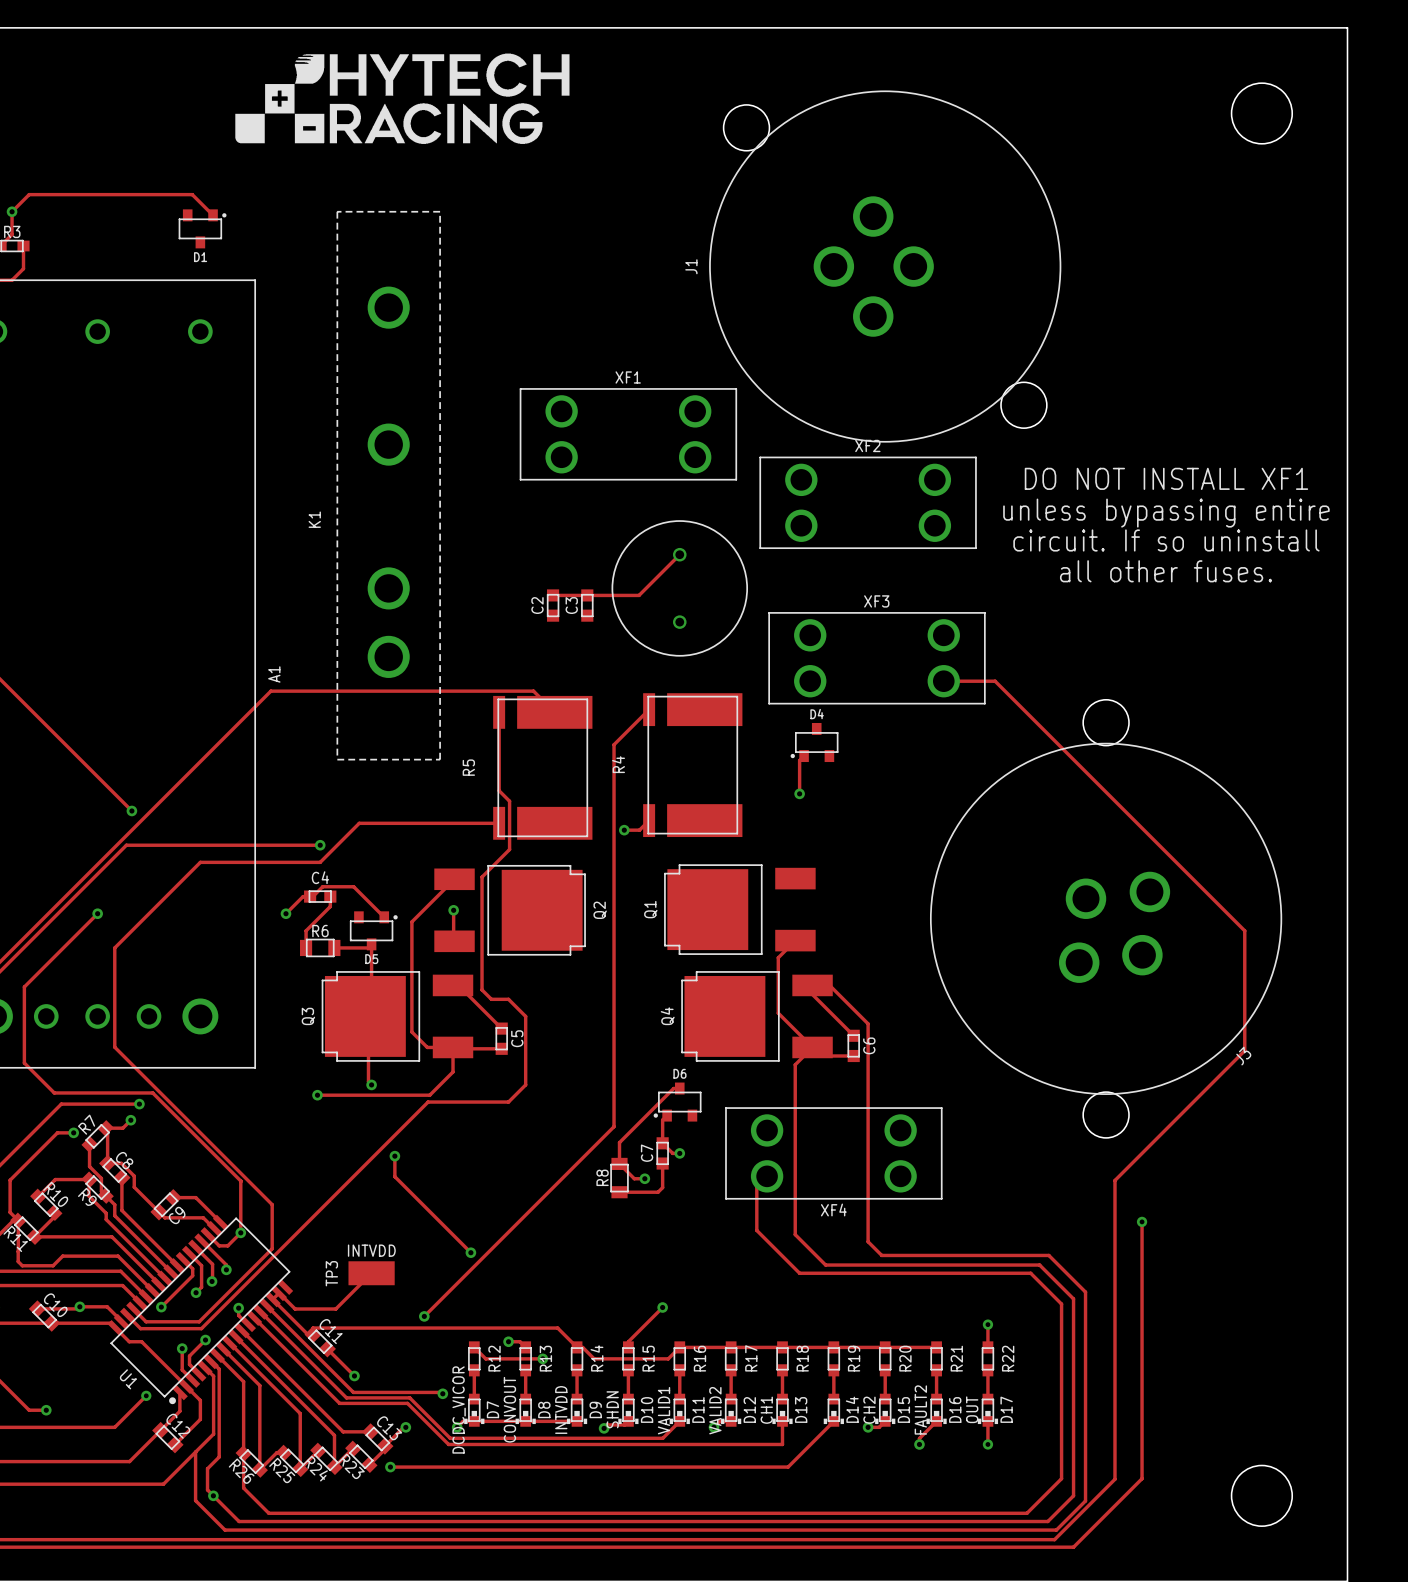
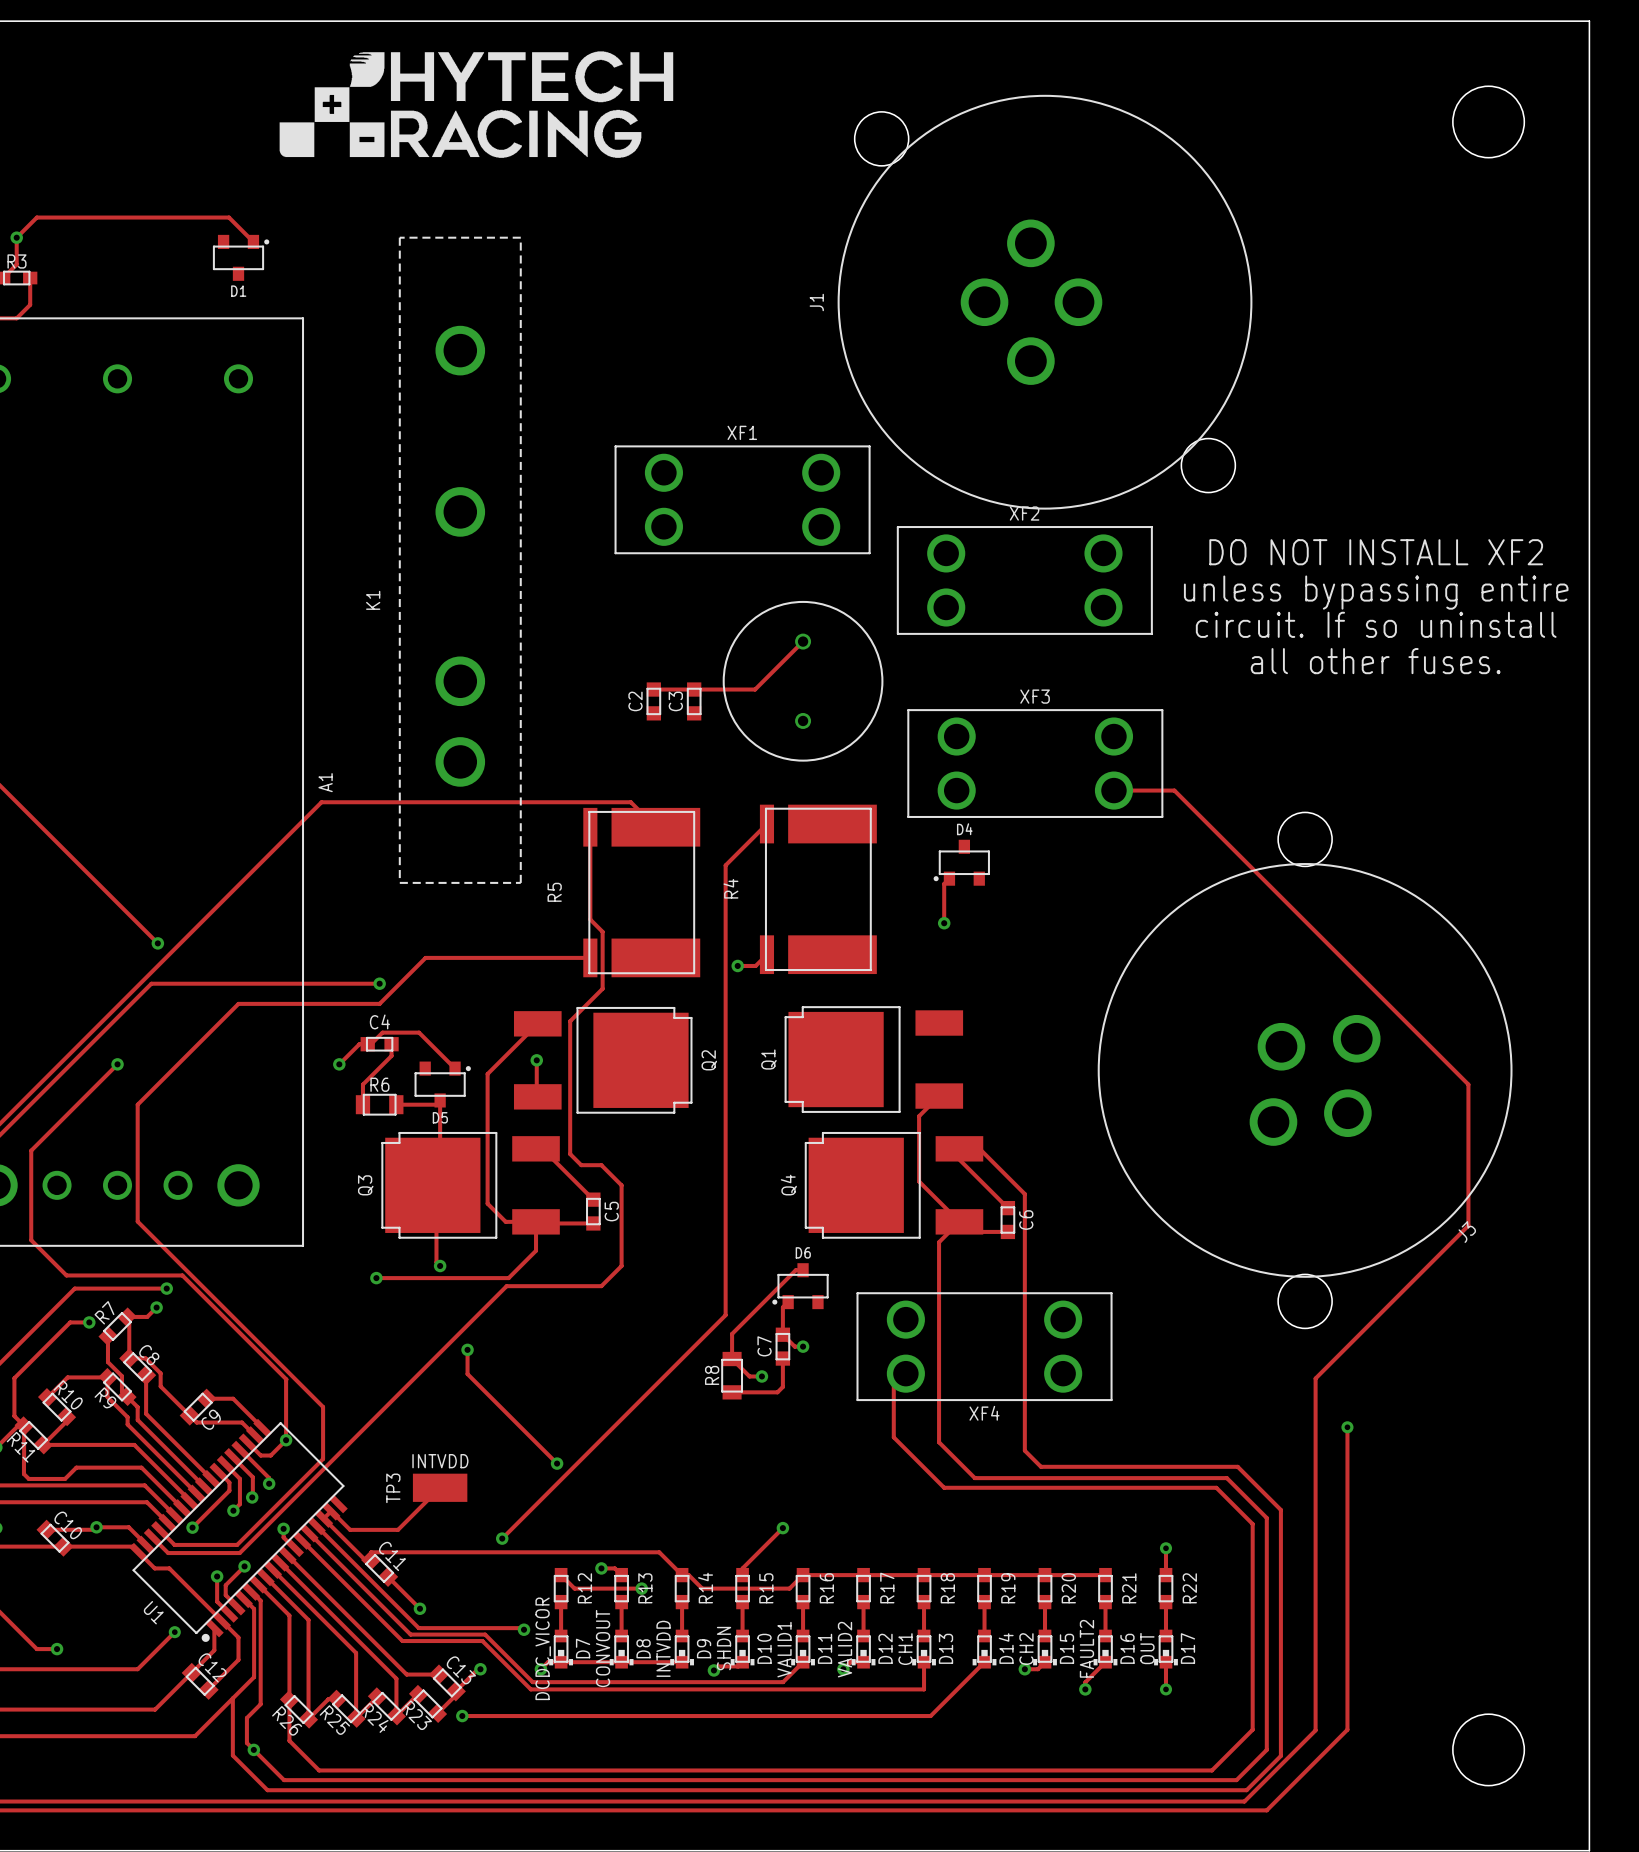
text: DO NOT INSTALL XF1 (1166, 478) -> DO NOT INSTALL XF2 (1376, 552)

